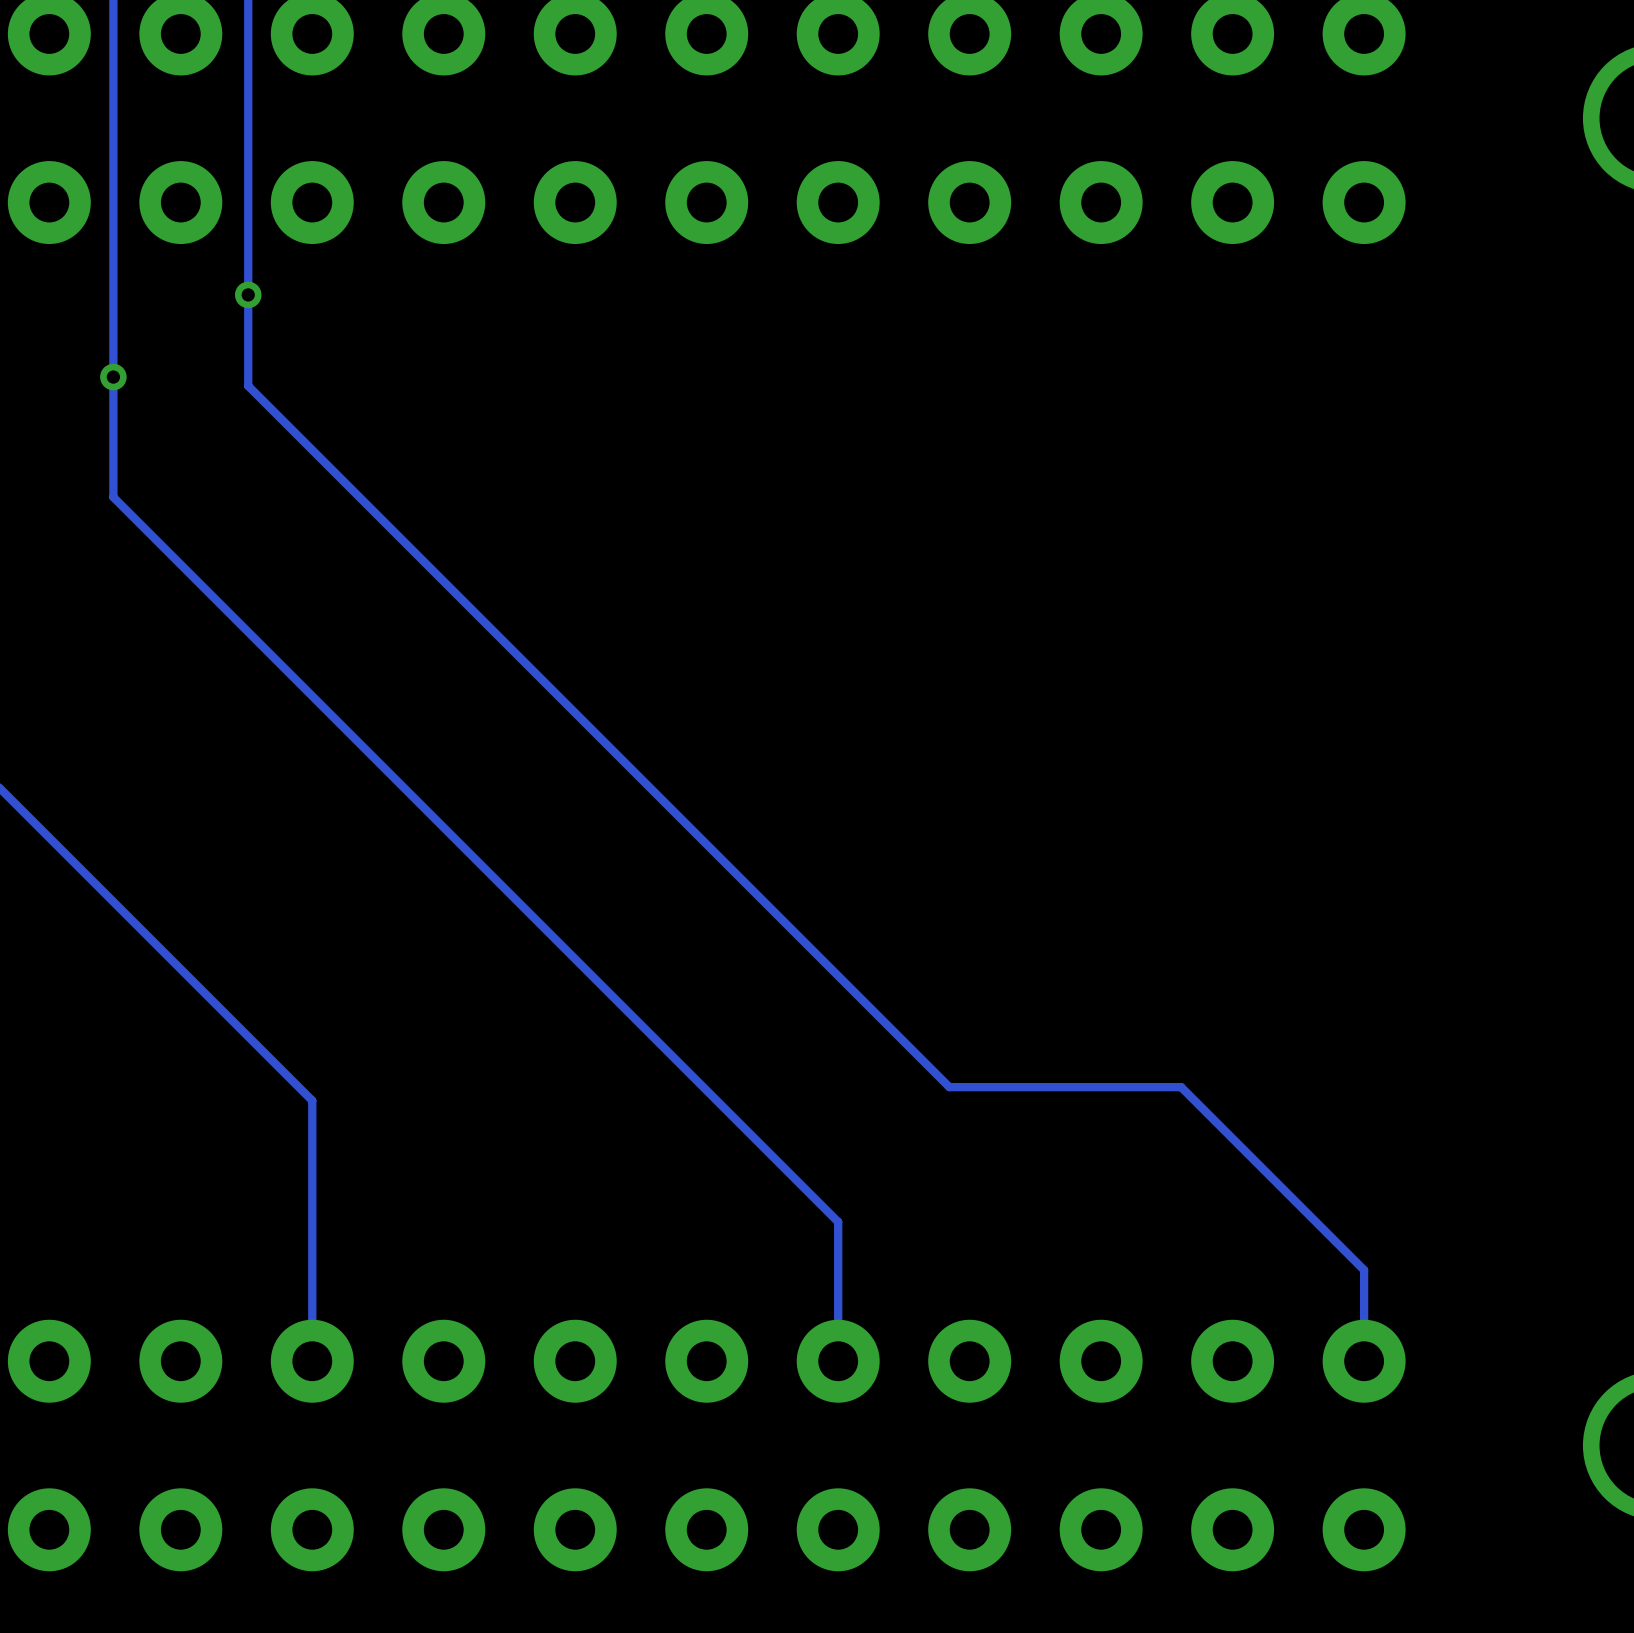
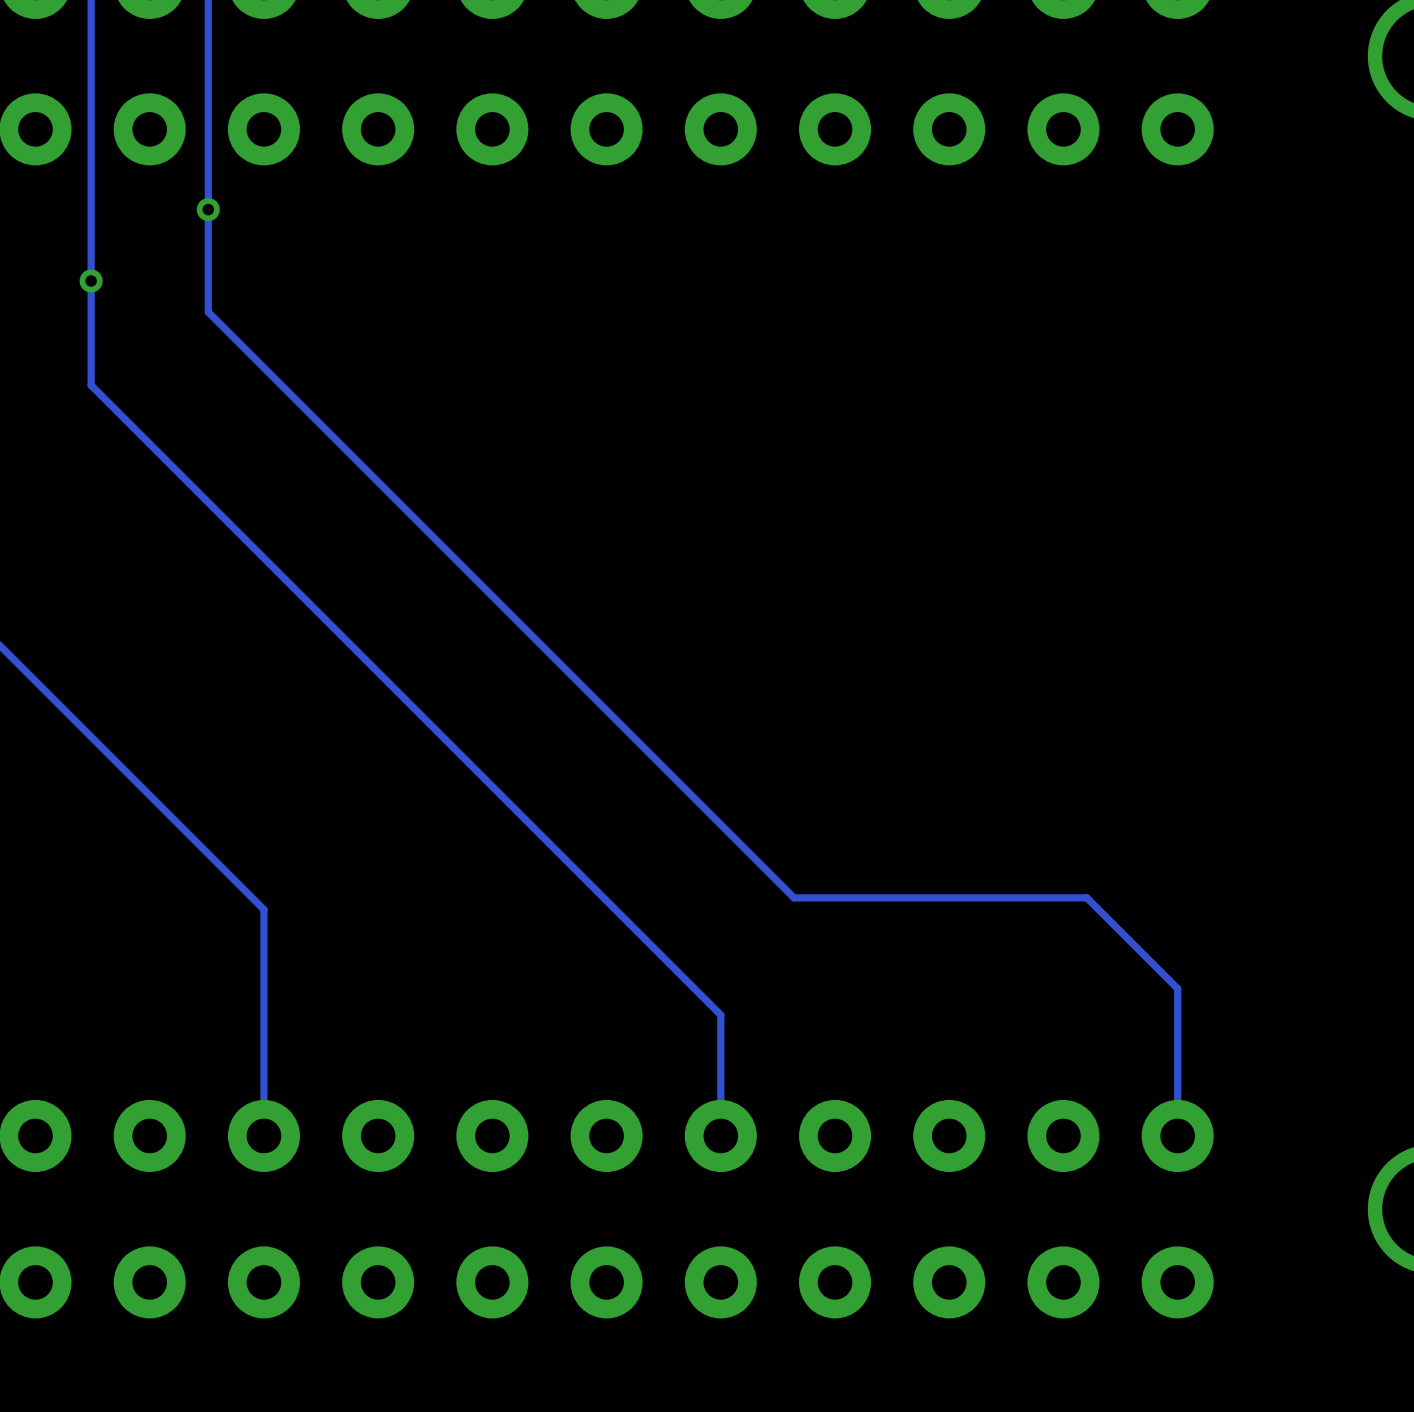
track: (248, 385) (949, 1087) -> (208, 288) (208, 312) (794, 897) (817, 897)
track: (1181, 1087) (1364, 1270) -> (1018, 897) (1086, 897) (1177, 988) (1177, 1056)

